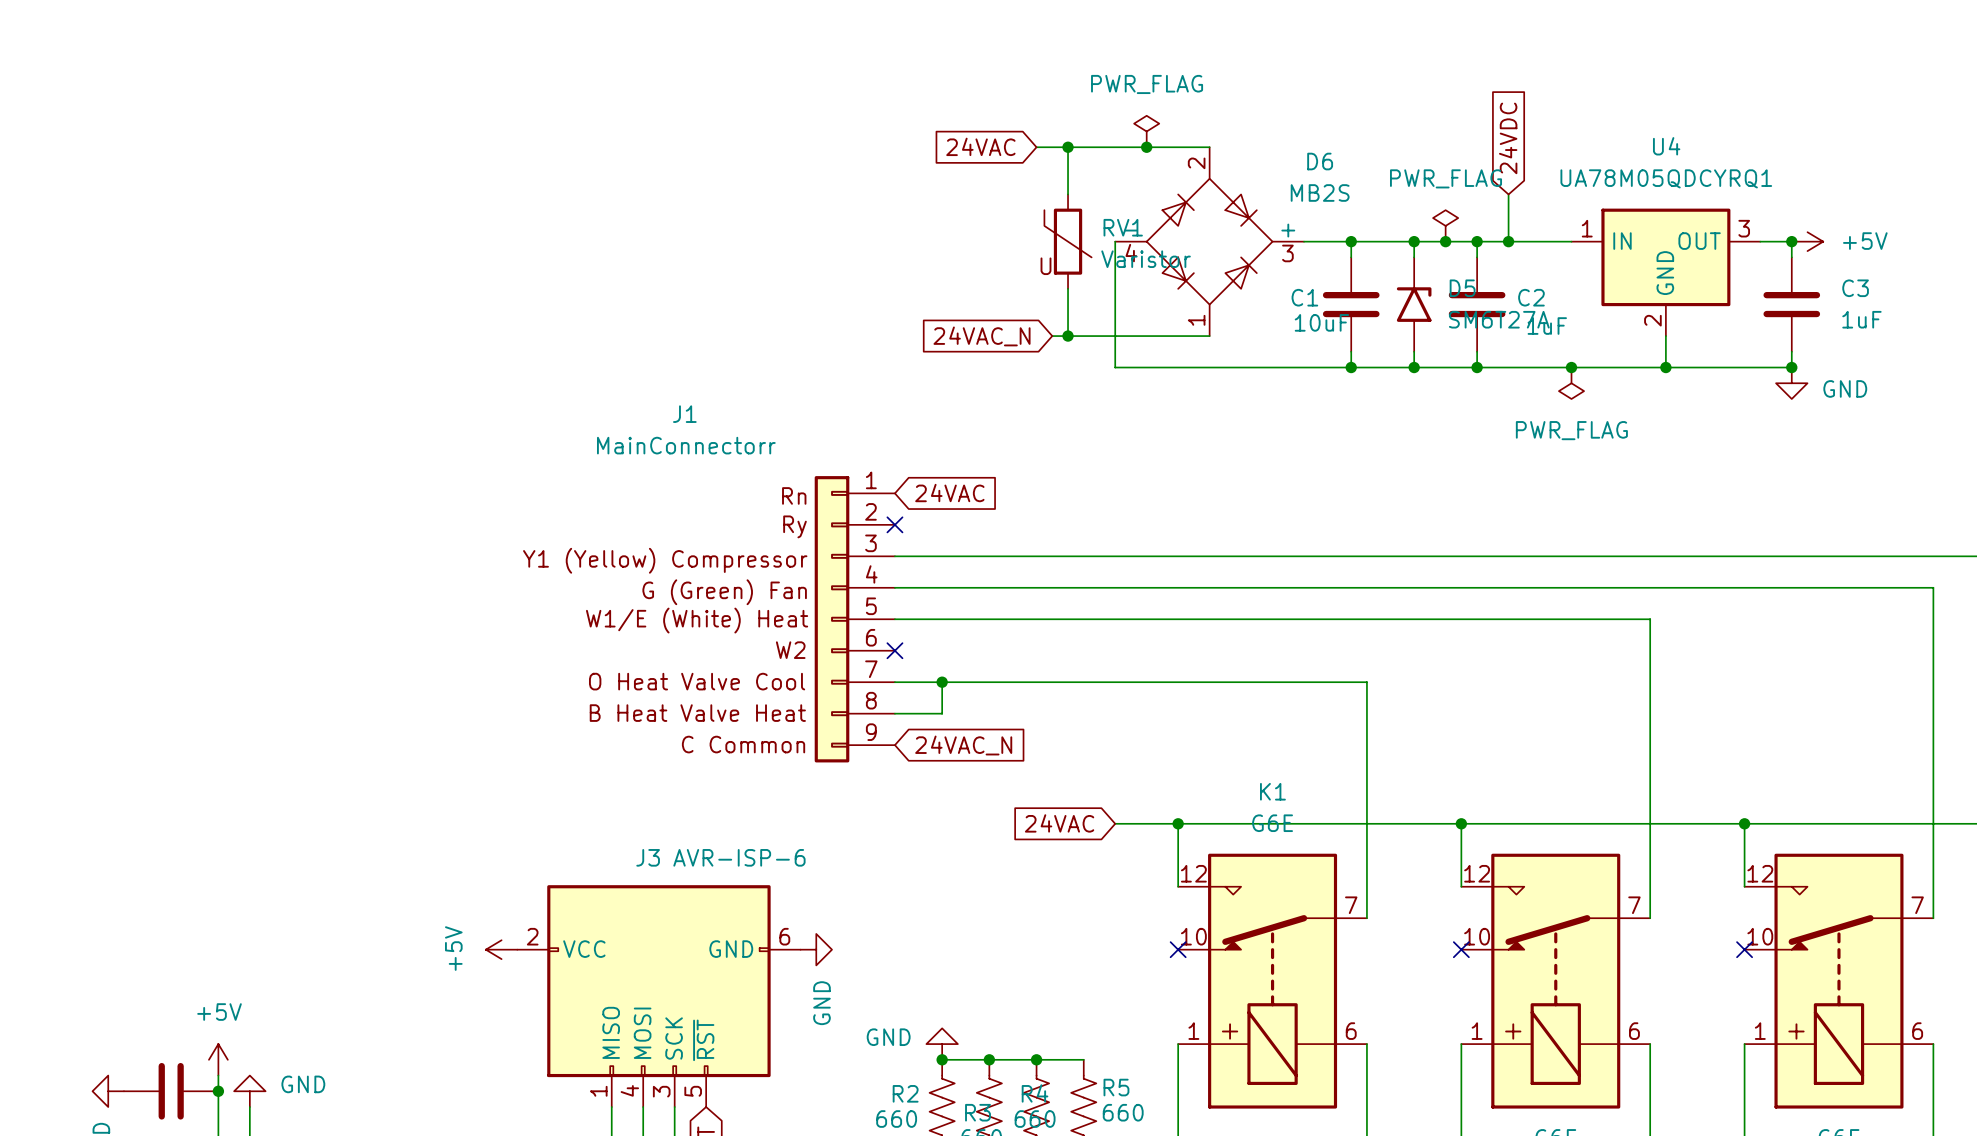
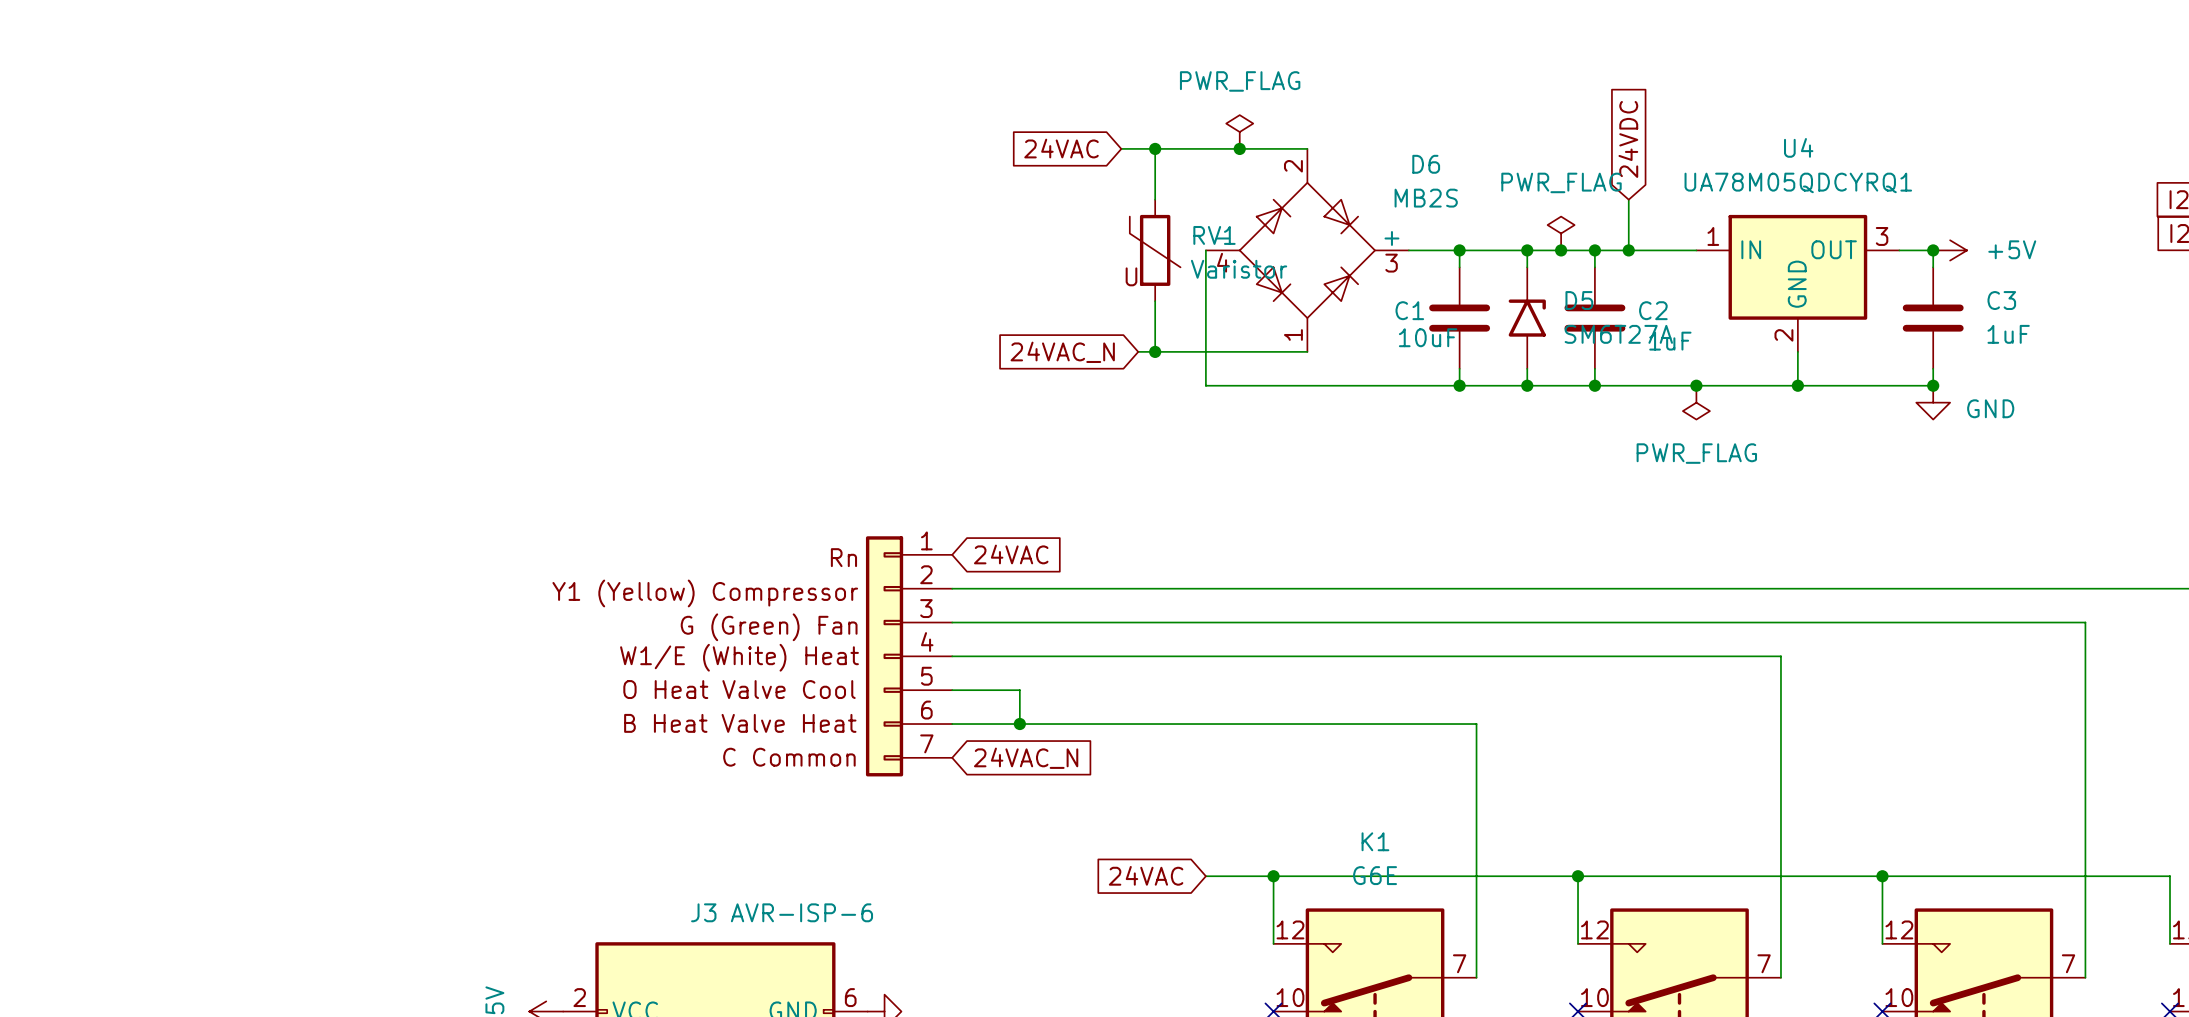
global label position: 24VAC (949, 493) -> 24VAC (1011, 554)
no-connect mark: (894, 524) -> none
part: none -> (909, 656)
J1: MainConnectorr (854, 619) -> none
no-connect mark: (894, 650) -> none
wire: (942, 682) (942, 713) (894, 713) -> (1019, 724) (1019, 690) (952, 690)
global label position: 24VAC_N (963, 745) -> 24VAC_N (1026, 758)

